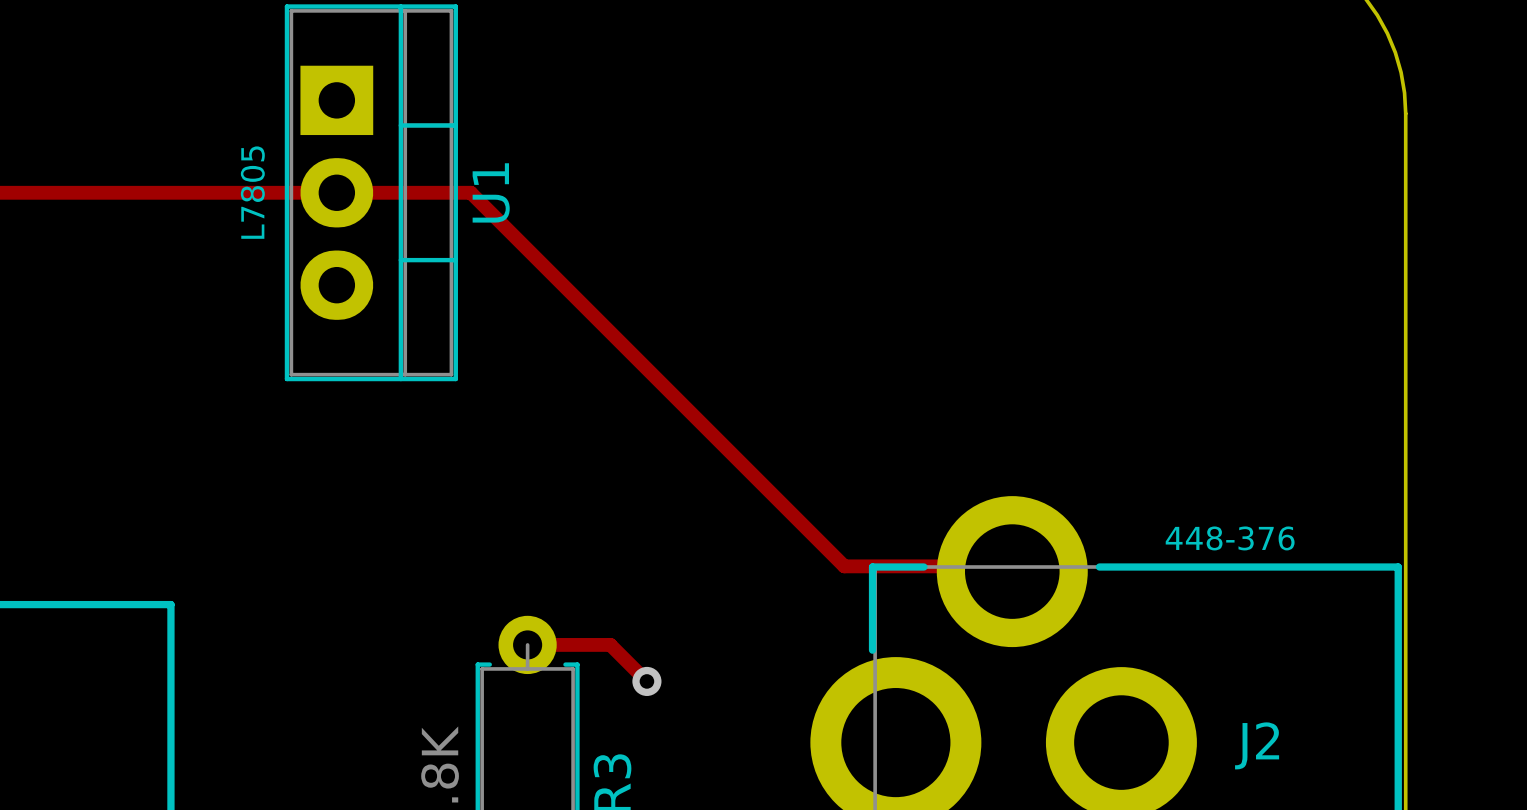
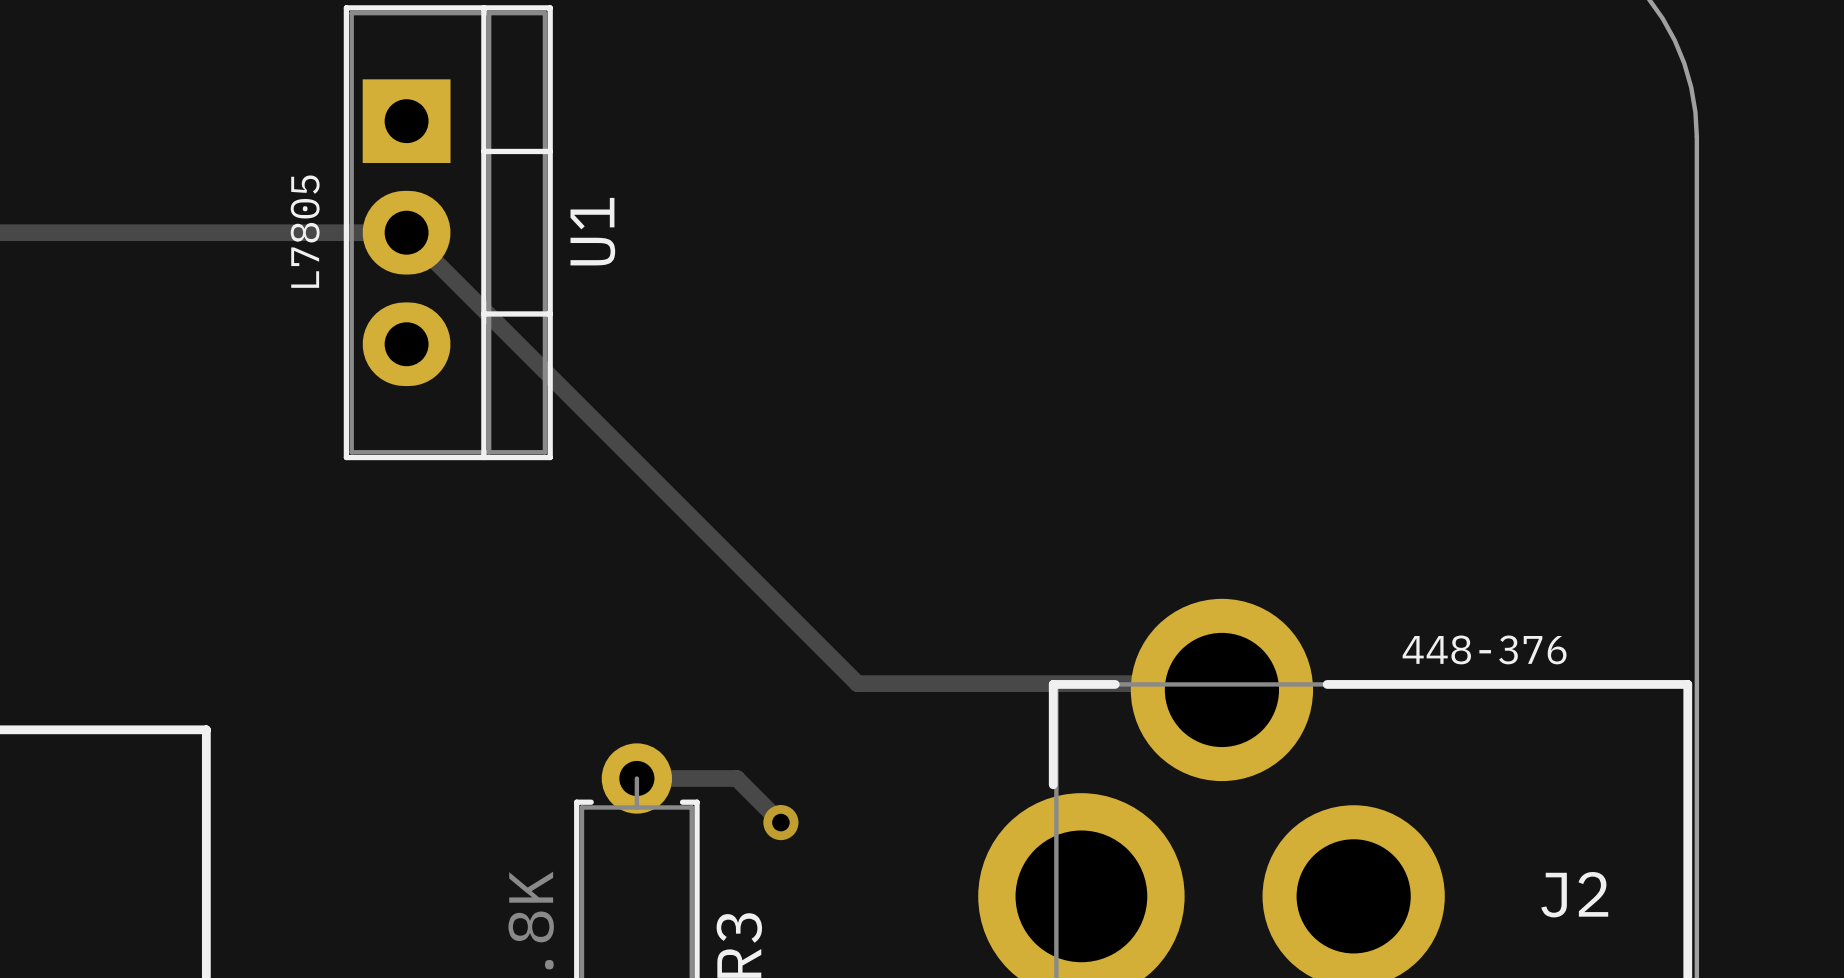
track: (336, 192) (470, 192) (844, 566) -> (406, 232) (857, 683) (1019, 683)
J2 name position: J2 (1257, 745) -> J2 (1574, 894)

